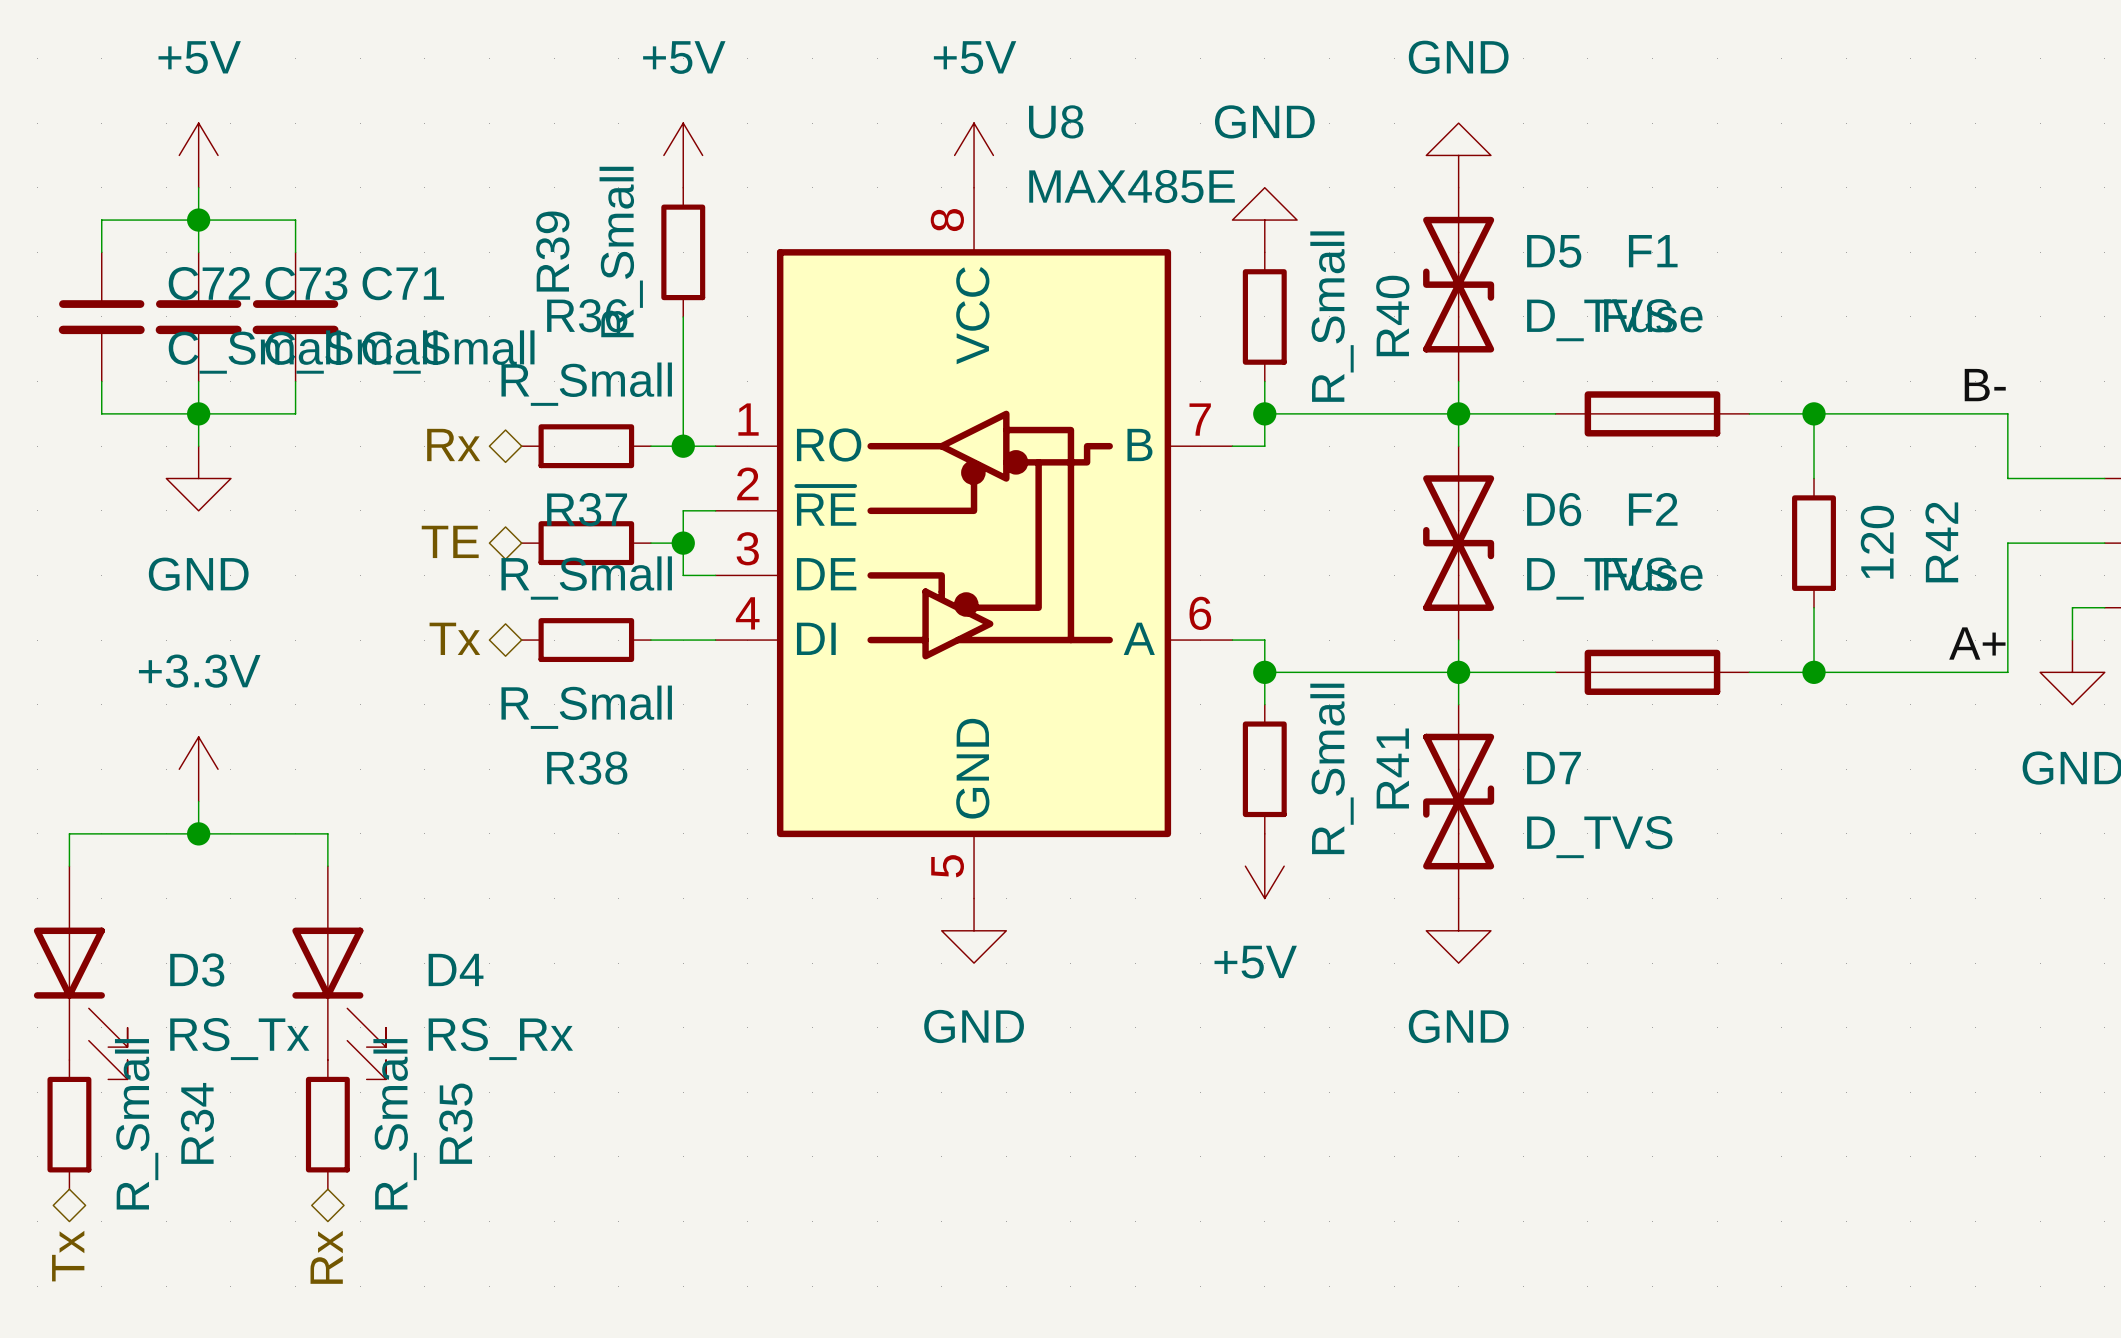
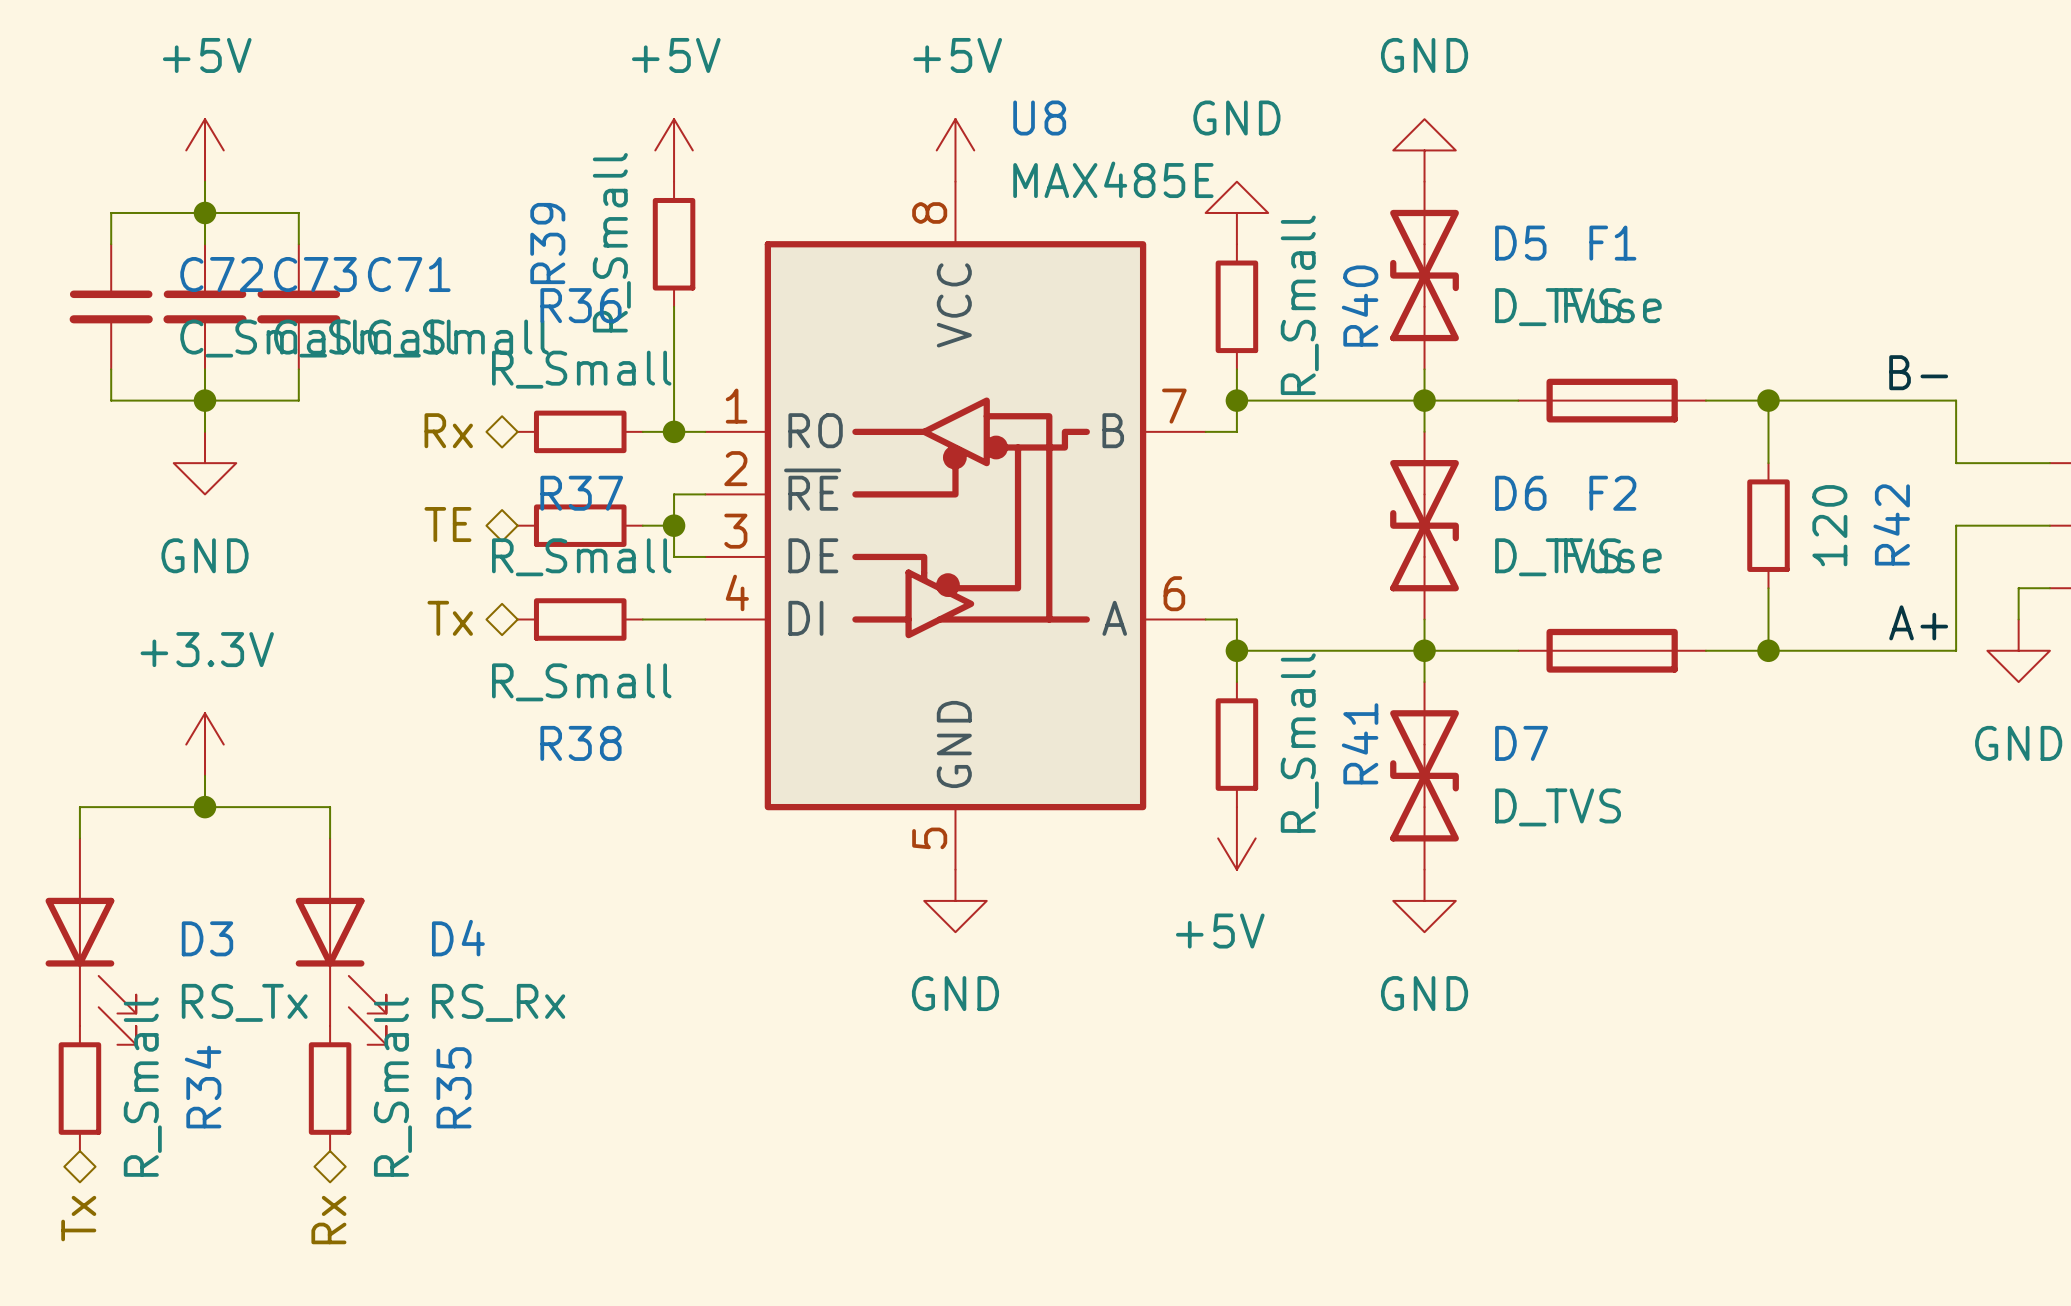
D7 flip: as is (1458, 801) -> left-right (1424, 775)

